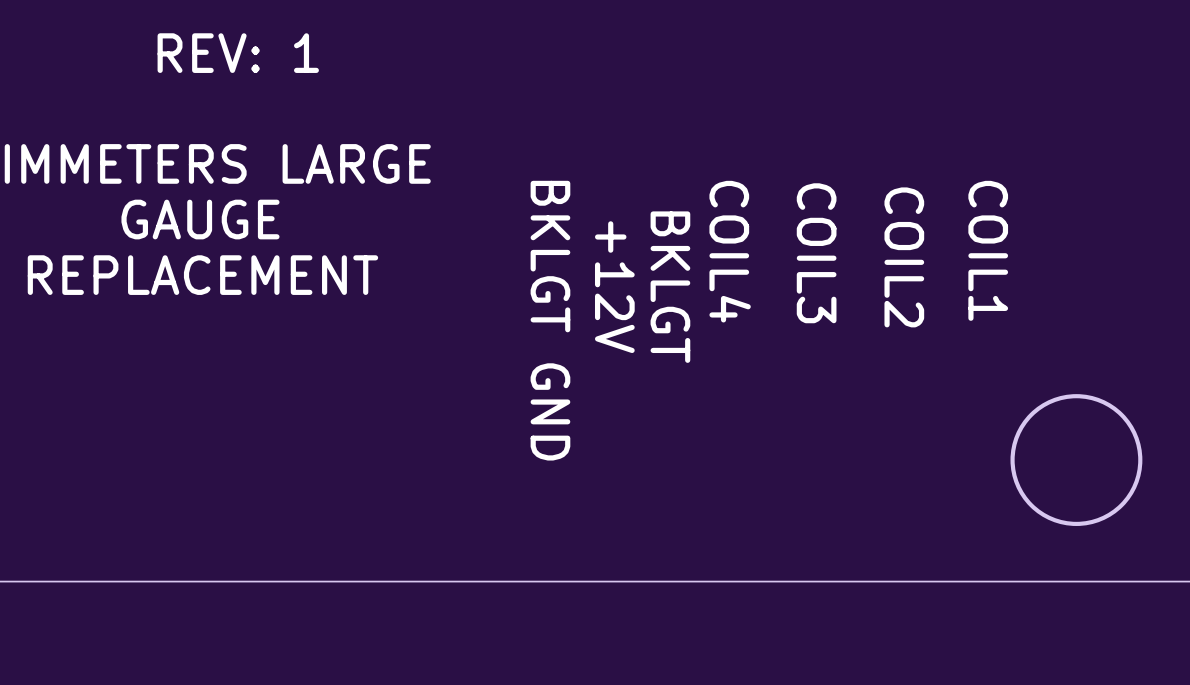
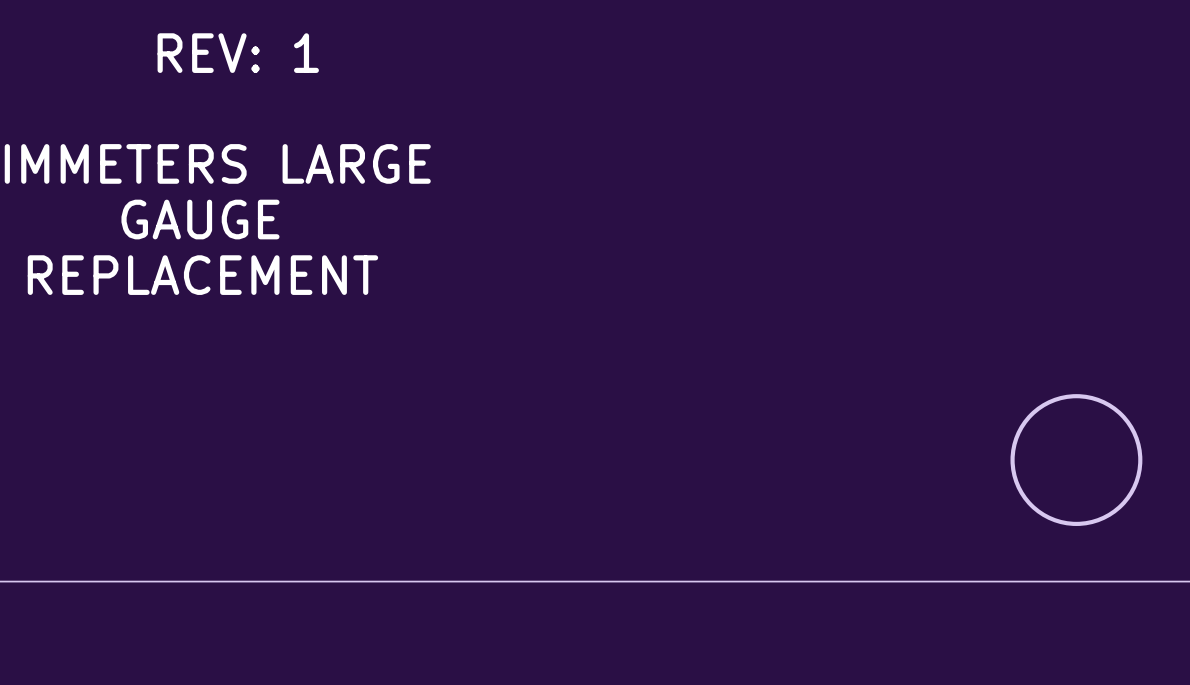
text: COIL1 (988, 250) -> none
text: COIL4 (730, 251) -> none
text: COIL3 (816, 253) -> none
text: COIL2 (904, 257) -> none
text: +12V (614, 287) -> none
text: BKLGT (670, 287) -> none
text: BKLGT GND (550, 320) -> none

